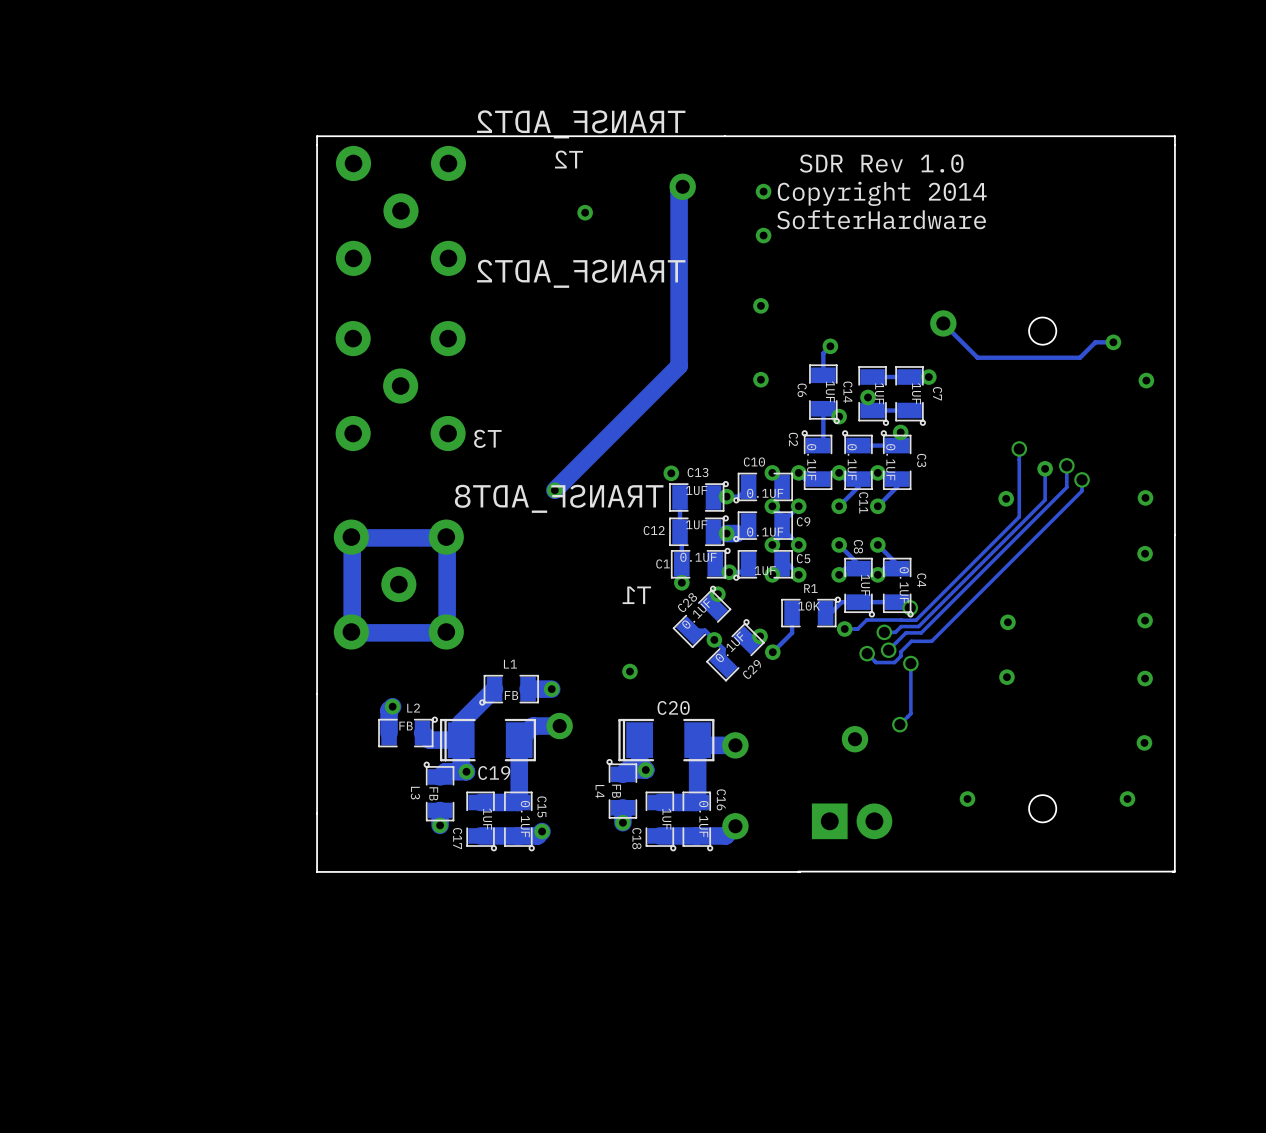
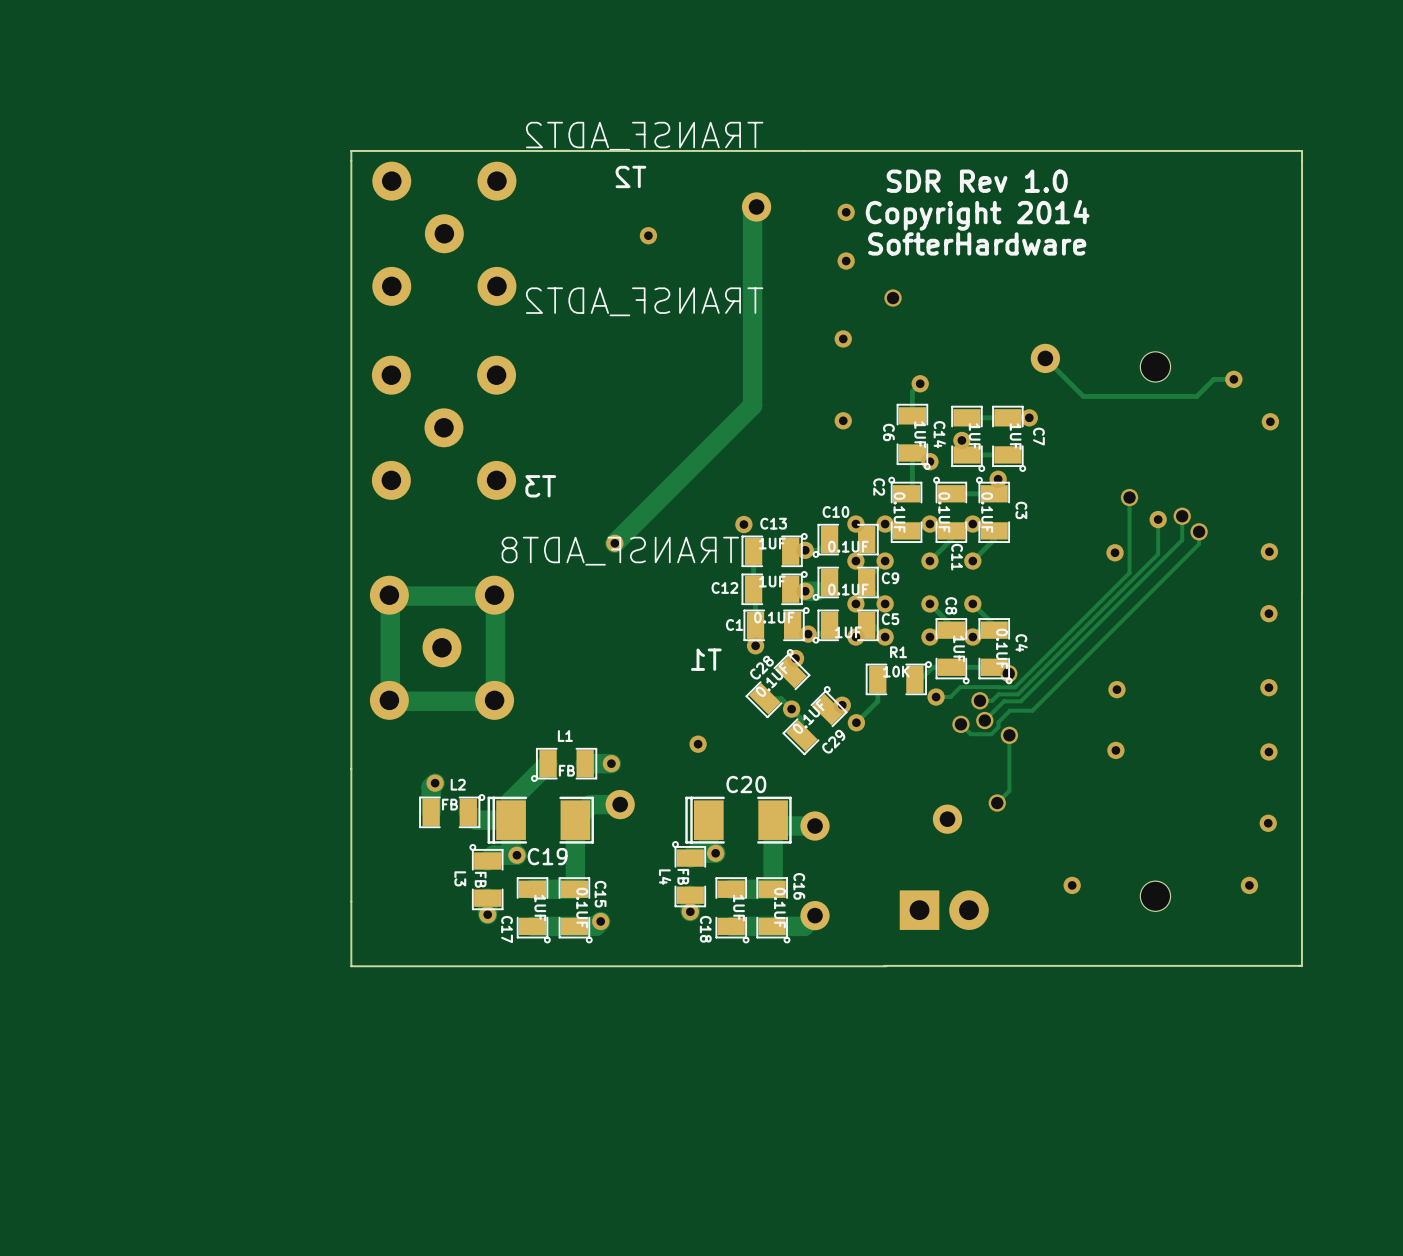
via: none -> (893, 298)

